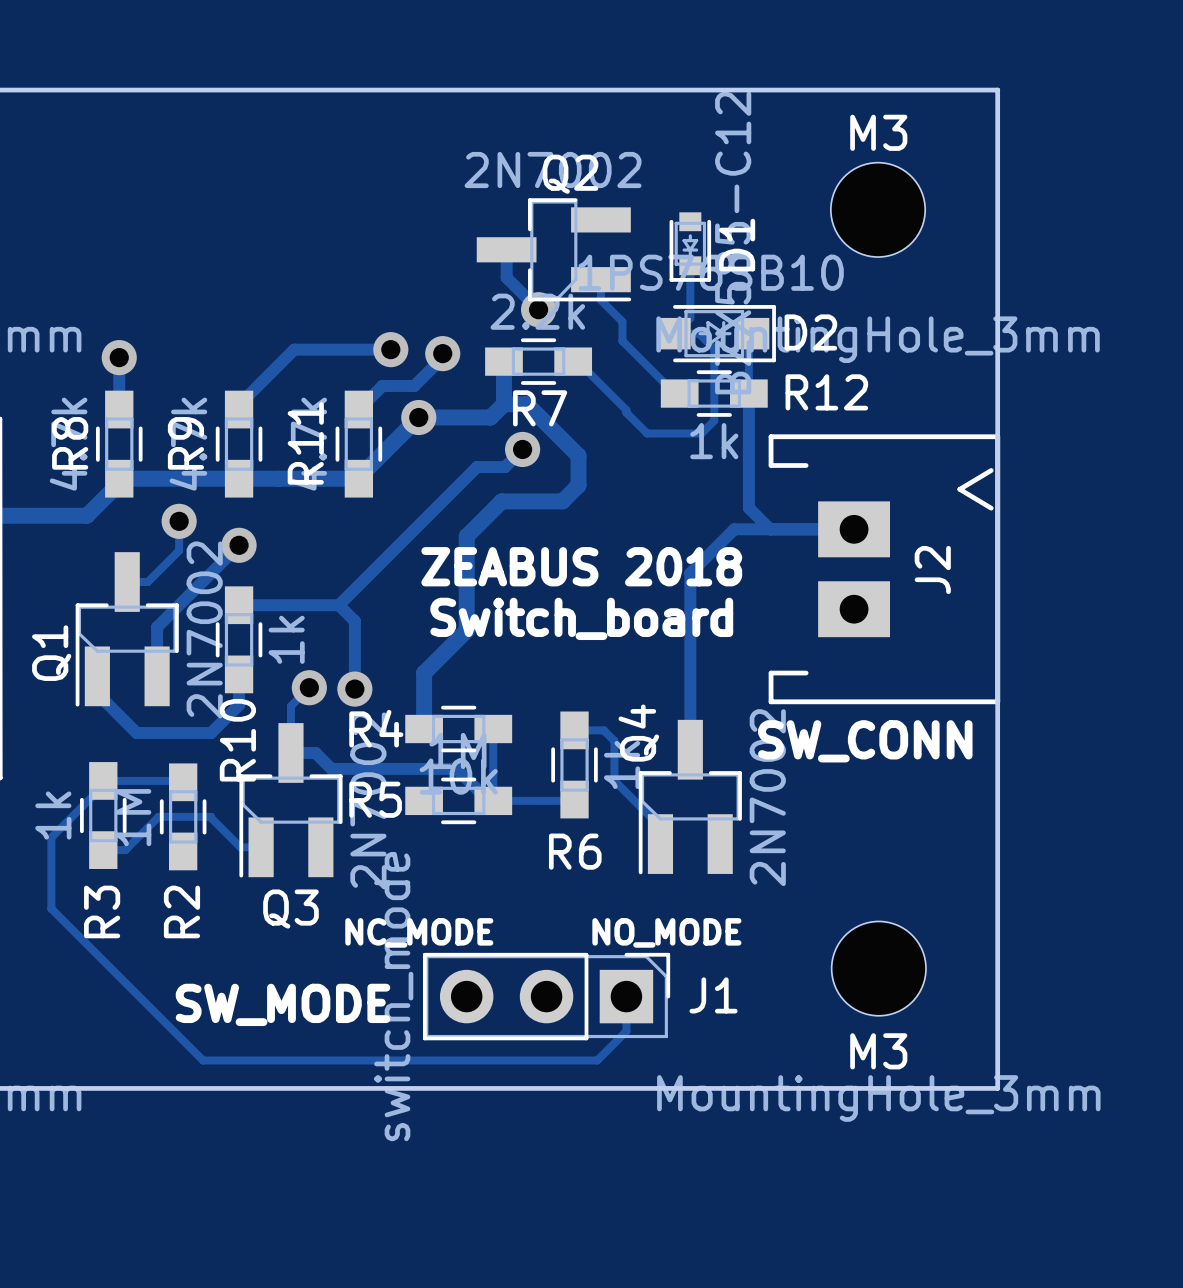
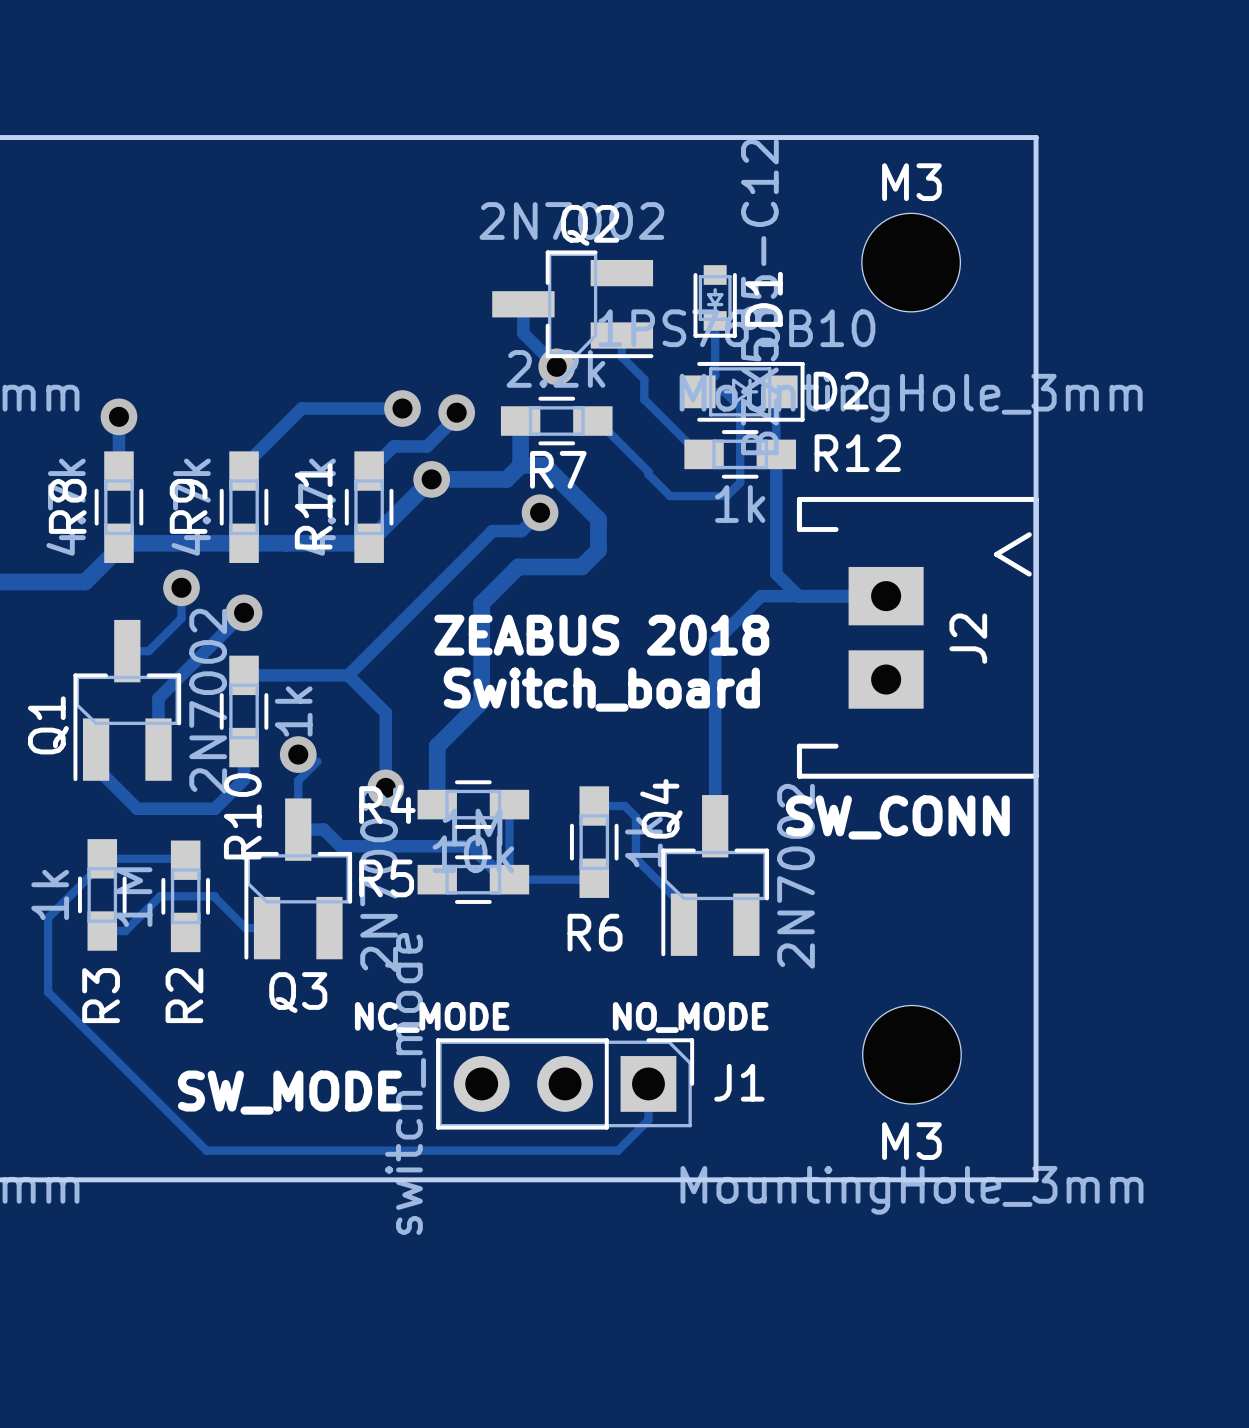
track: (354, 621) (354, 689) -> (364, 692) (385, 712) (385, 787)
via position: (309, 687) -> (298, 754)
via position: (354, 689) -> (385, 787)

